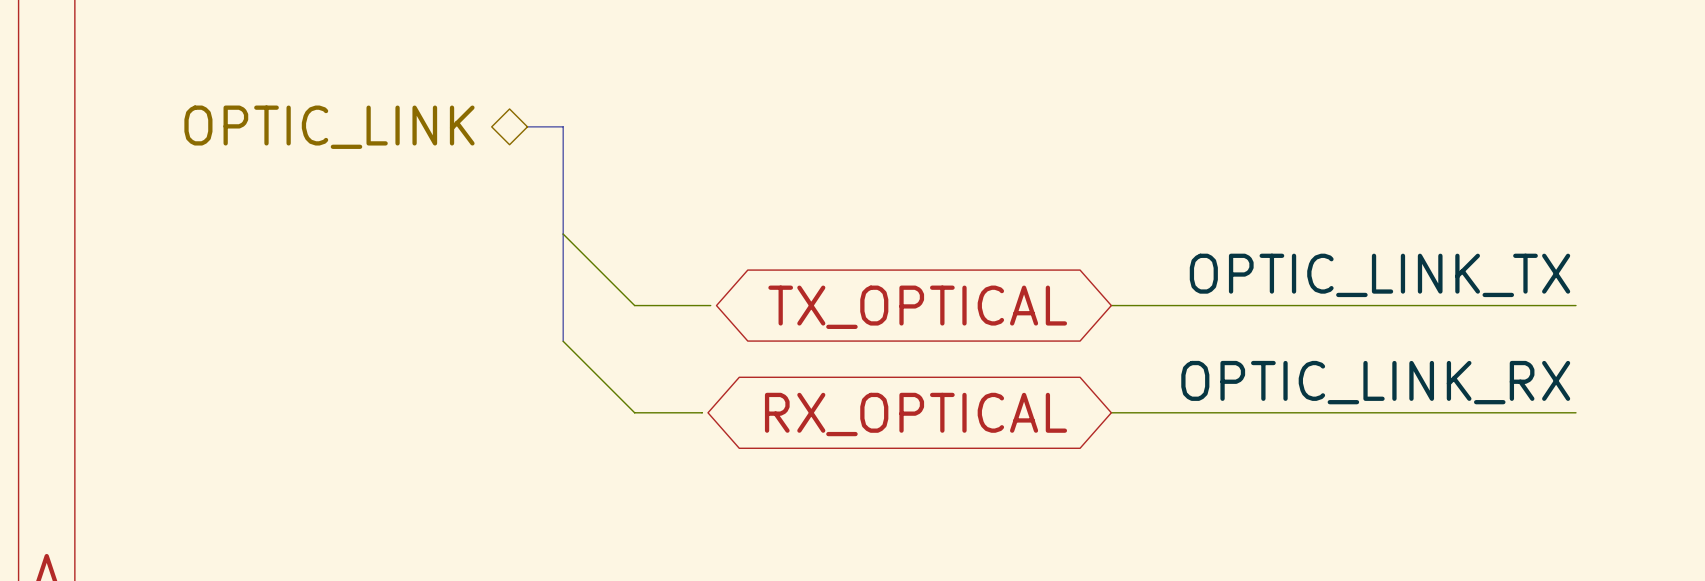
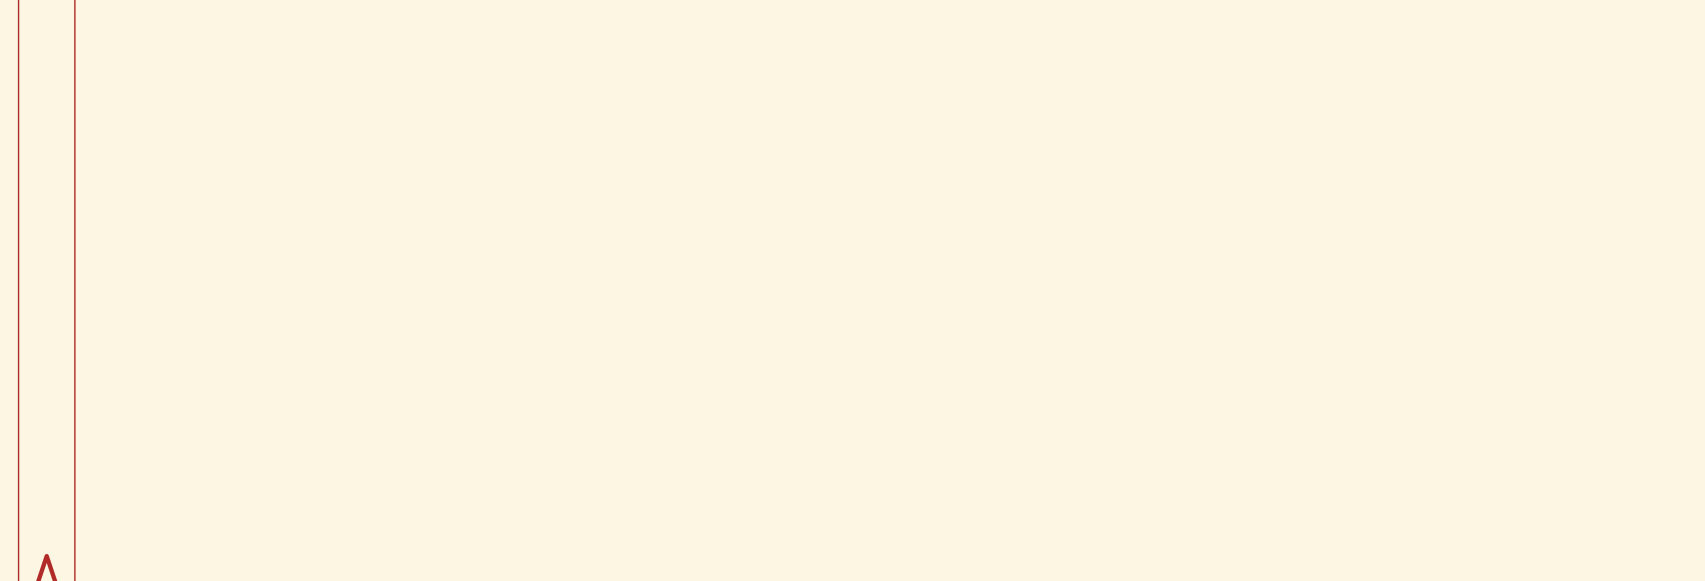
bus: (527, 126) (563, 126) (563, 341) -> none
hierarchical label: OPTIC_LINK (329, 127) -> none
wire: (563, 234) (634, 305) (710, 305) -> none
label: OPTIC_LINK_TX (1379, 275) -> none
wire: (1111, 305) (1575, 305) -> none
global label: TX_OPTICAL (917, 307) -> none
wire: (563, 341) (634, 412) (702, 412) -> none
label: OPTIC_LINK_RX (1375, 382) -> none
wire: (1111, 412) (1575, 412) -> none
global label: RX_OPTICAL (915, 414) -> none

